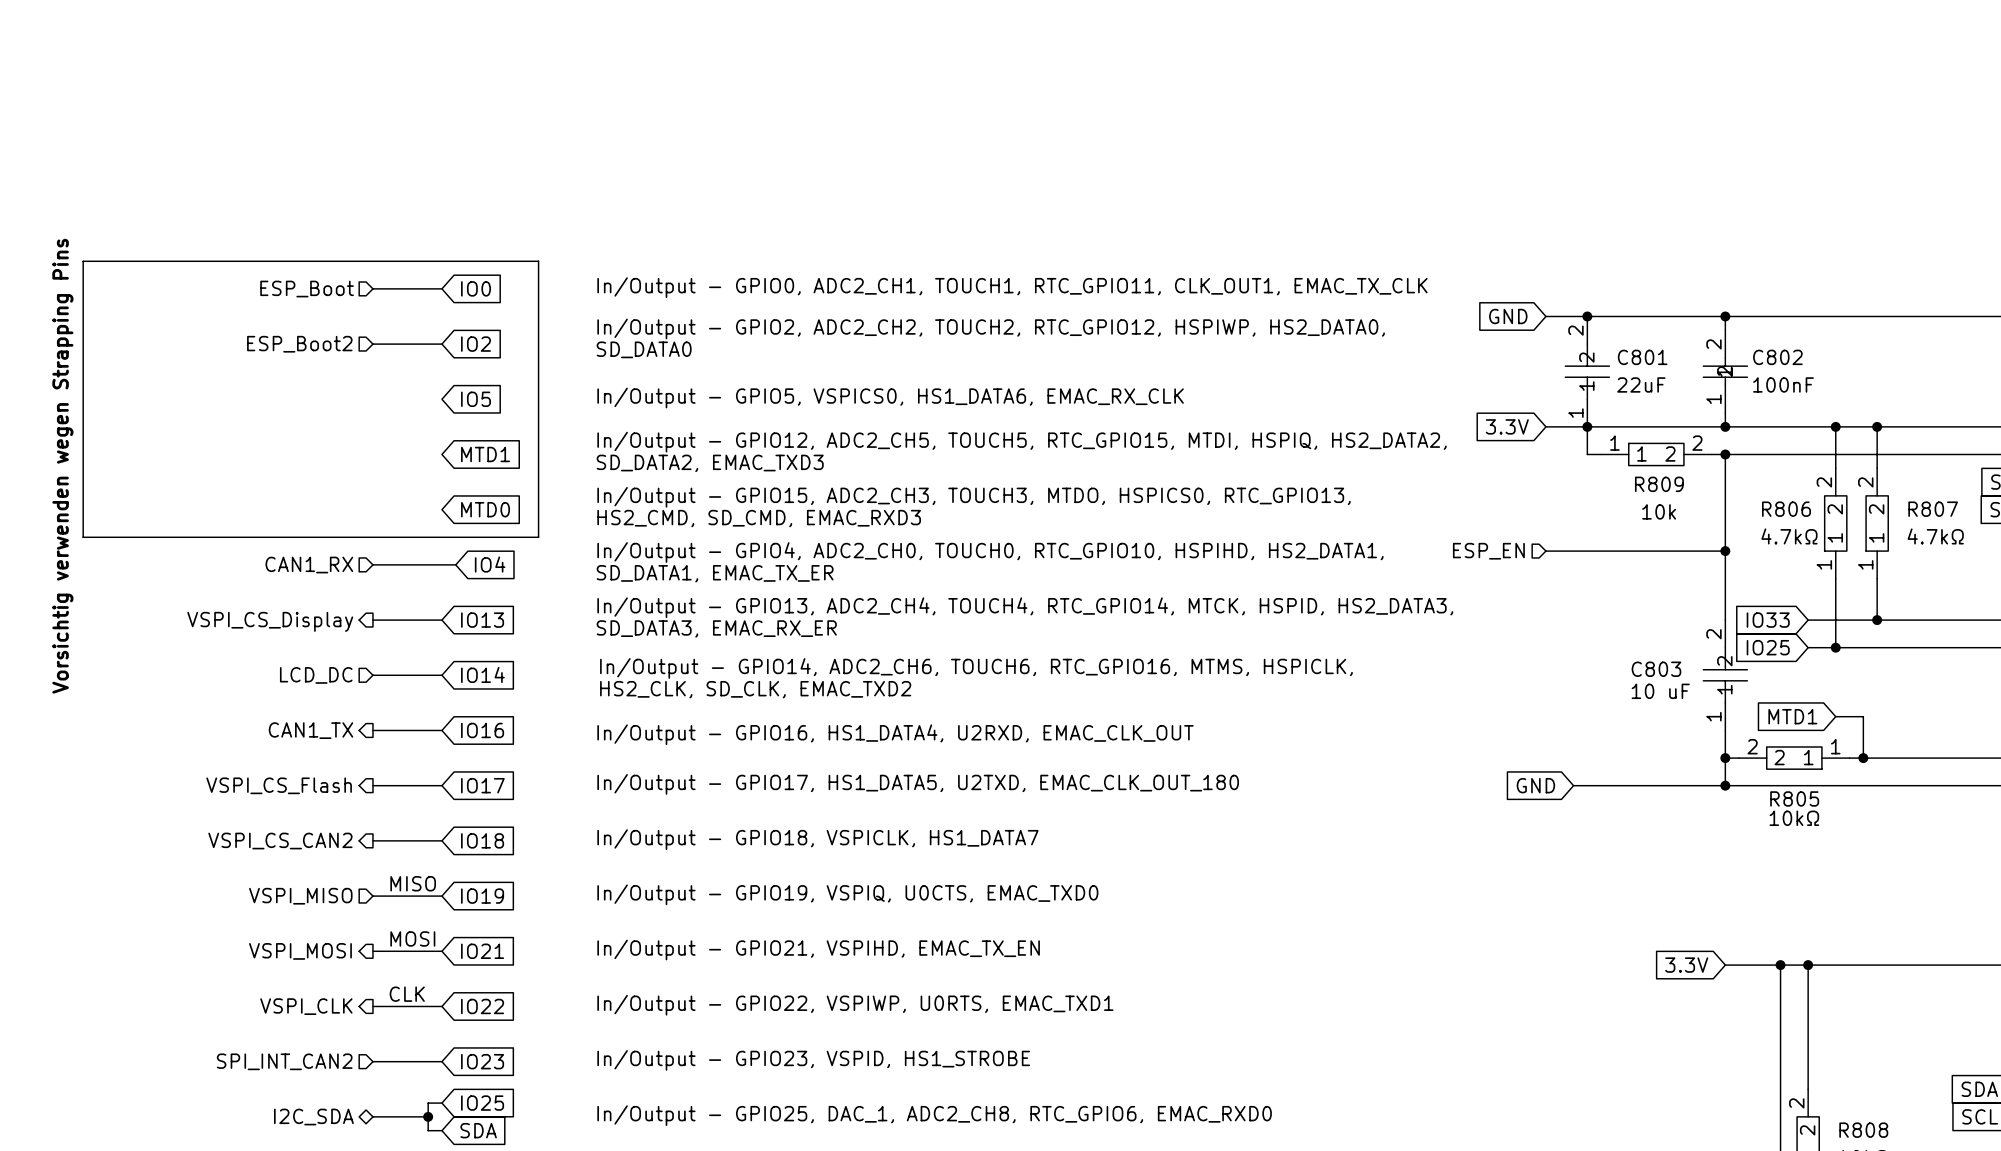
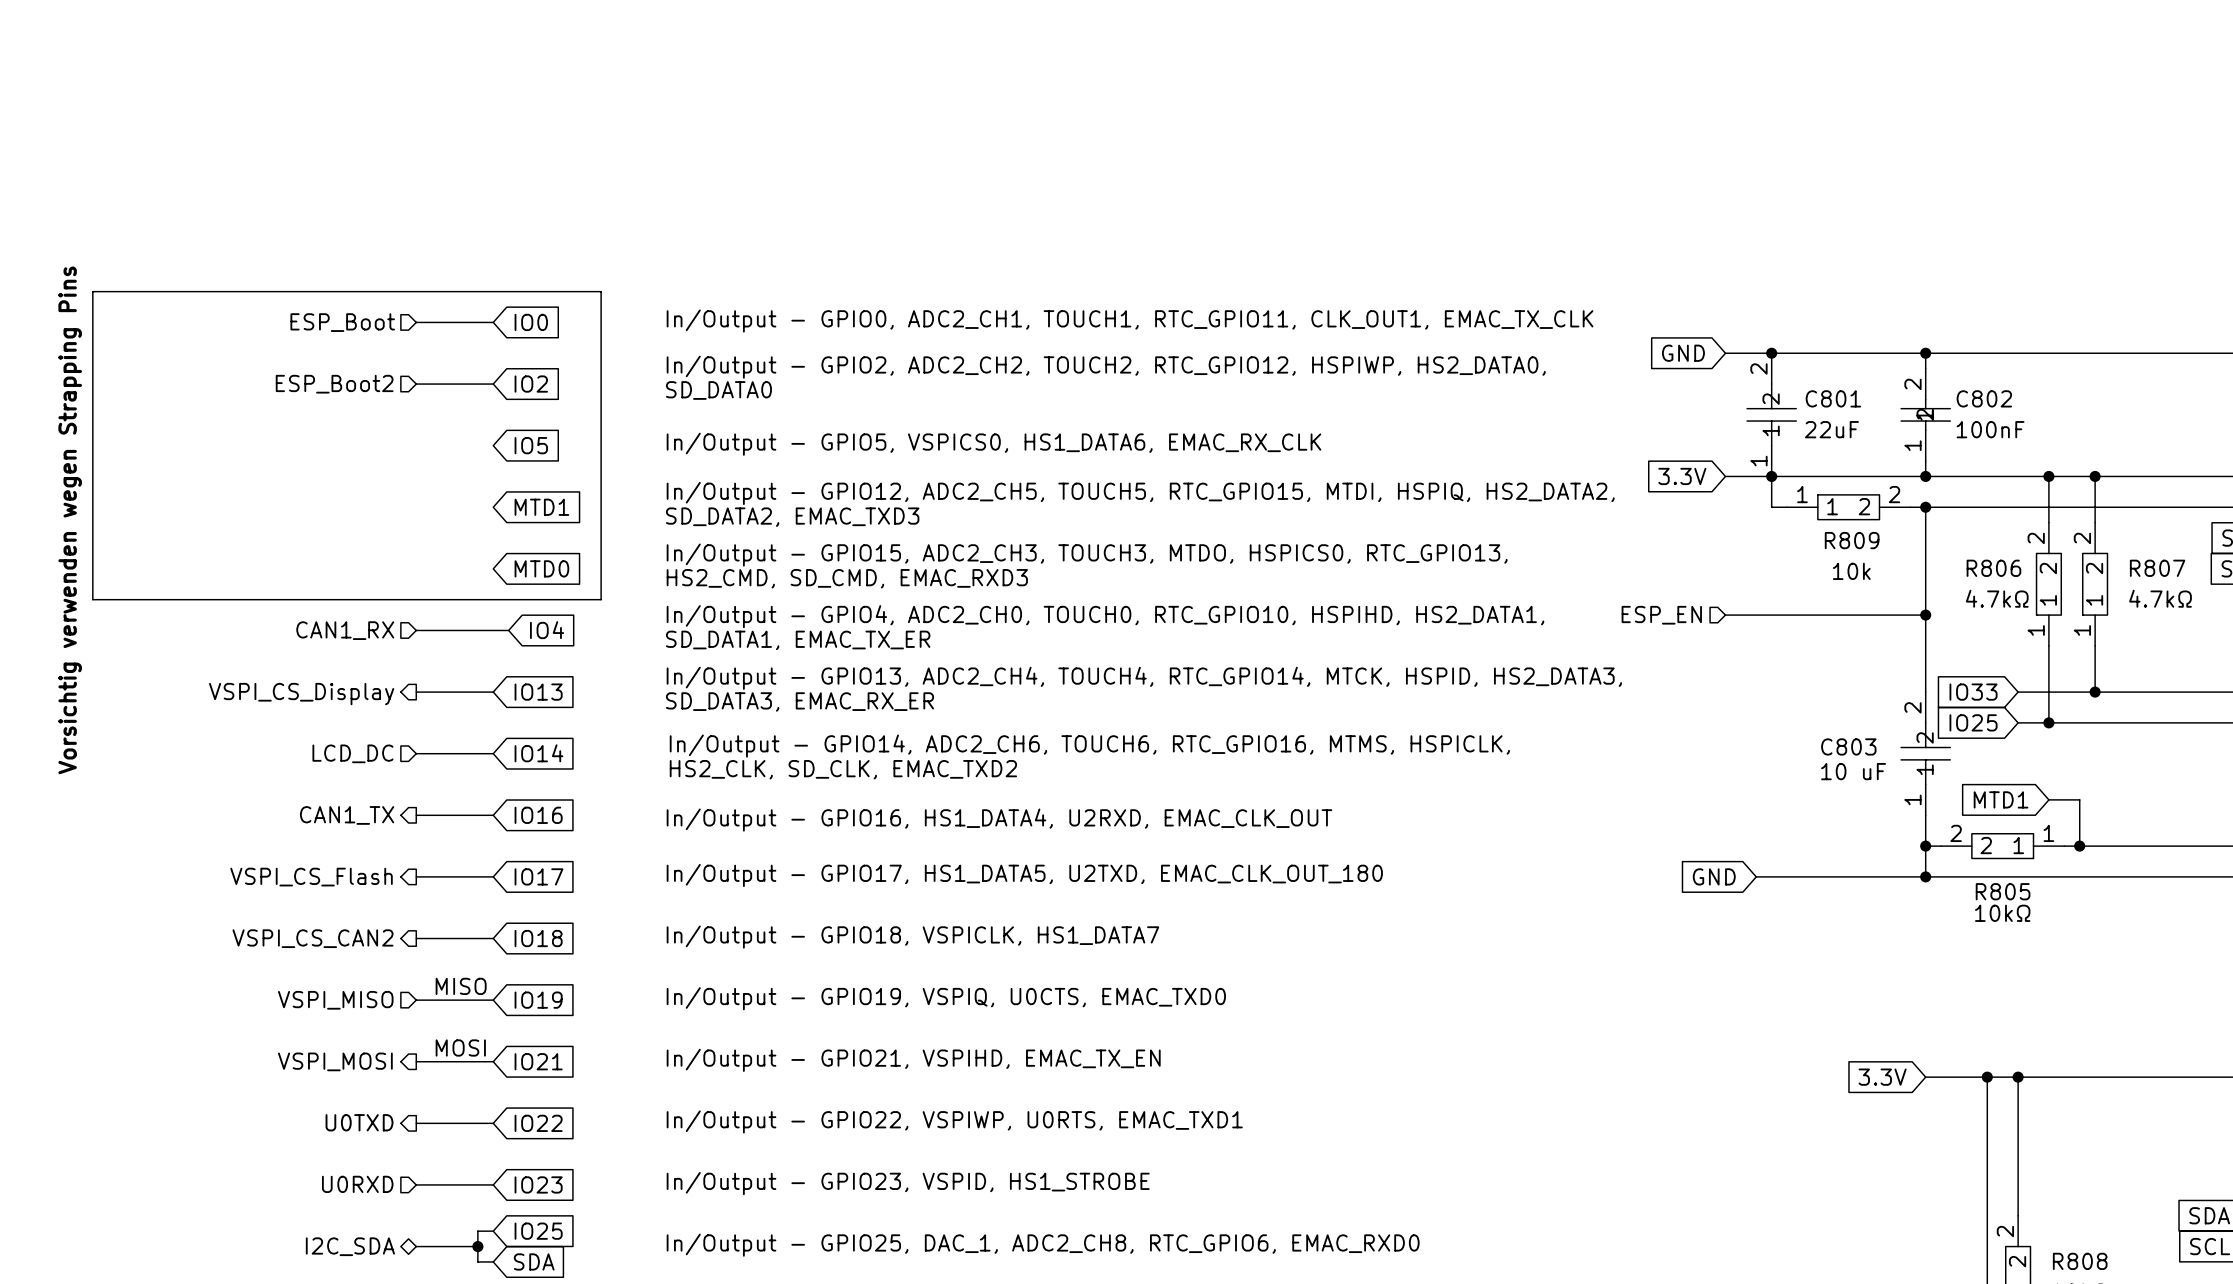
label: CLK (407, 994) -> none
hierarchical label: VSPI_CLK (306, 1006) -> U0TXD (359, 1122)
hierarchical label: SPI_INT_CAN2 (284, 1061) -> U0RXD (357, 1184)

